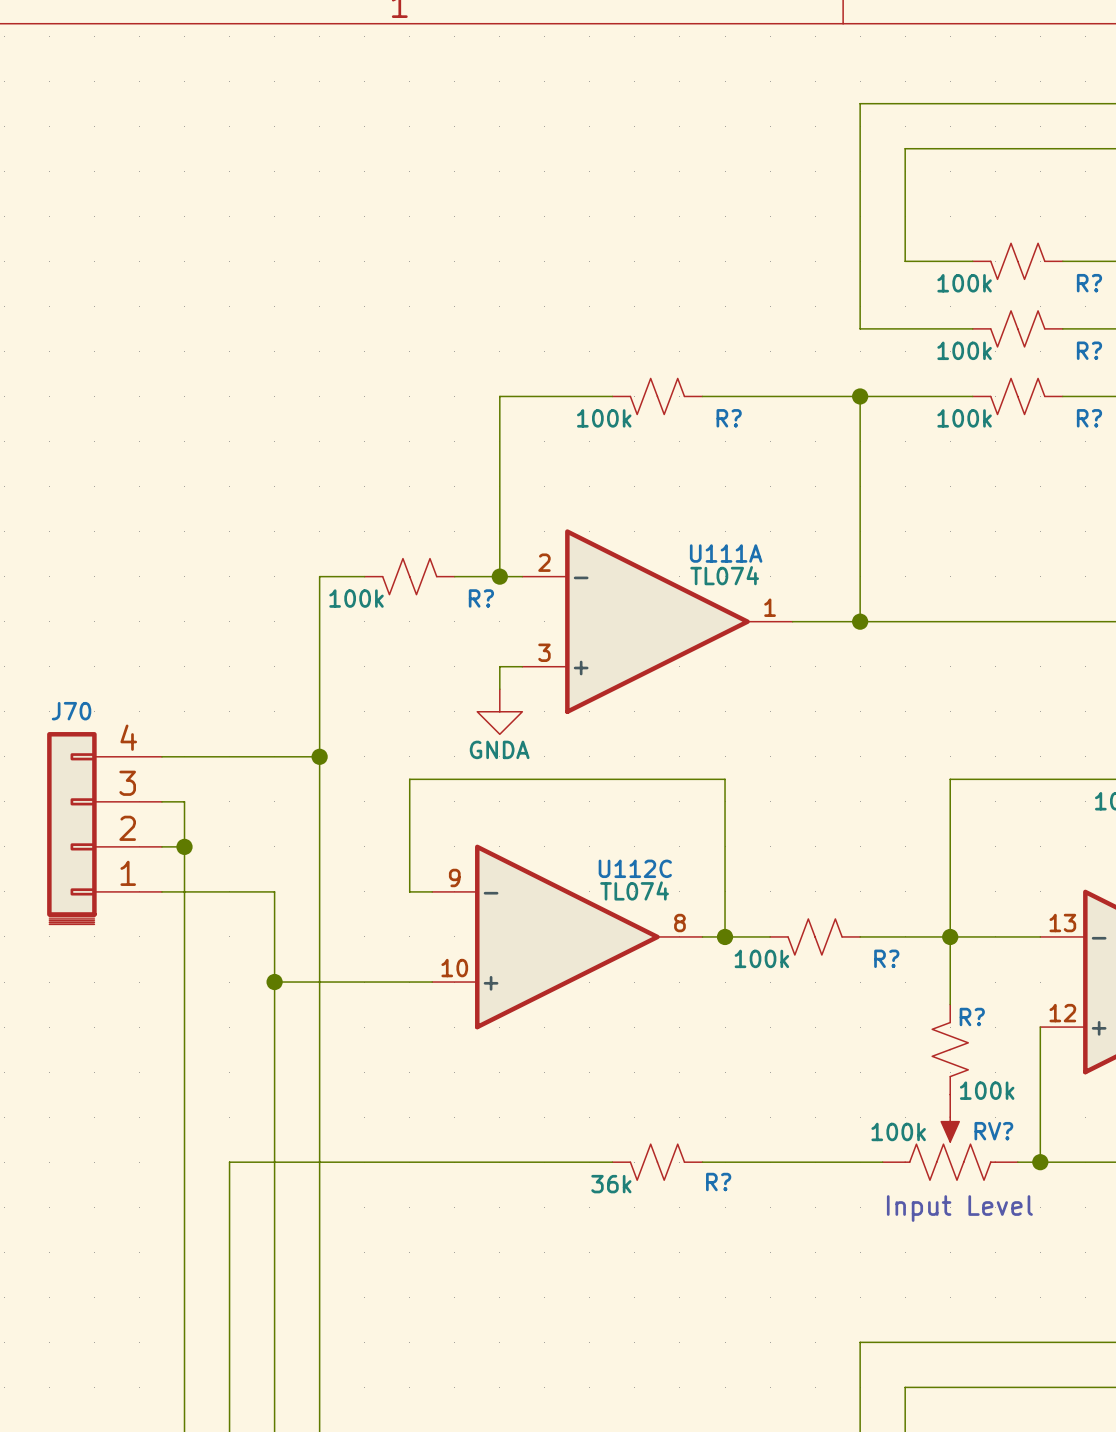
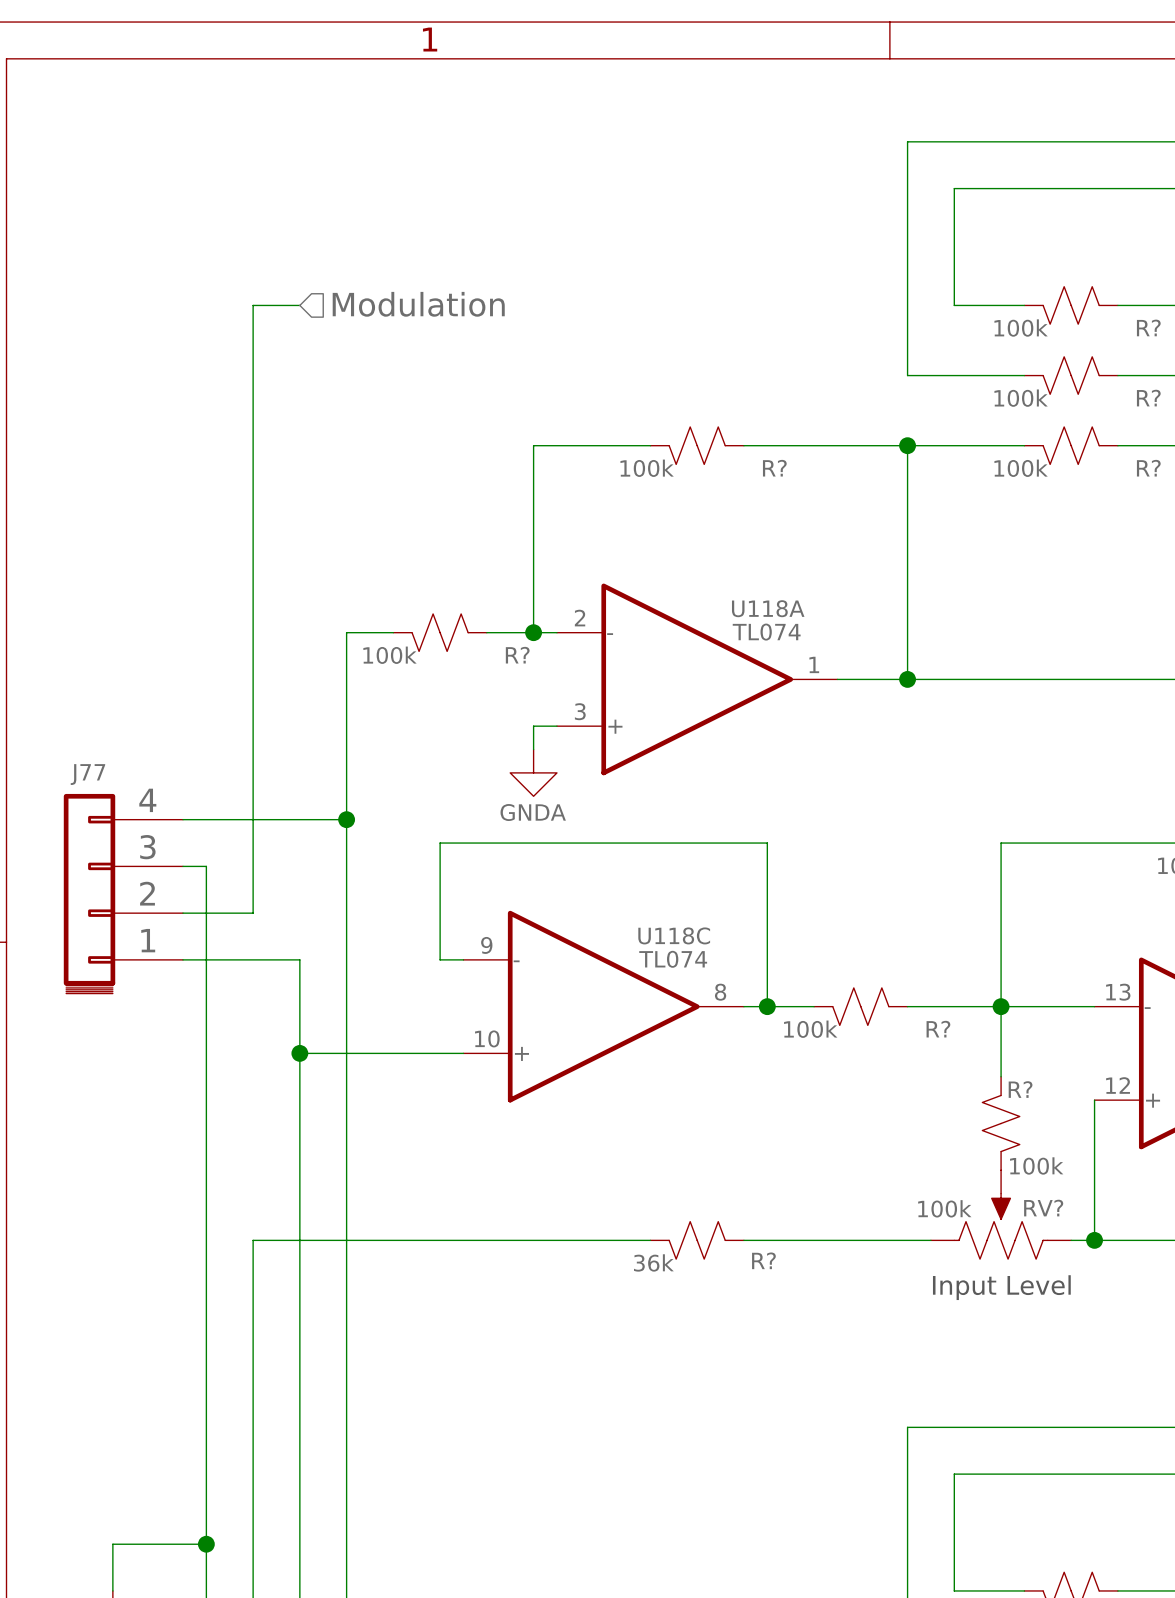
hierarchical label: none -> Modulation (418, 304)
wire: none -> (299, 305) (253, 305) (253, 913) (206, 913)
U111A name: U111A (726, 553) -> U118A (768, 608)
J70 name: J70 (71, 711) -> J77 (87, 774)
junction: (184, 846) -> none
U112C name: U112C (635, 868) -> U118C (674, 935)

